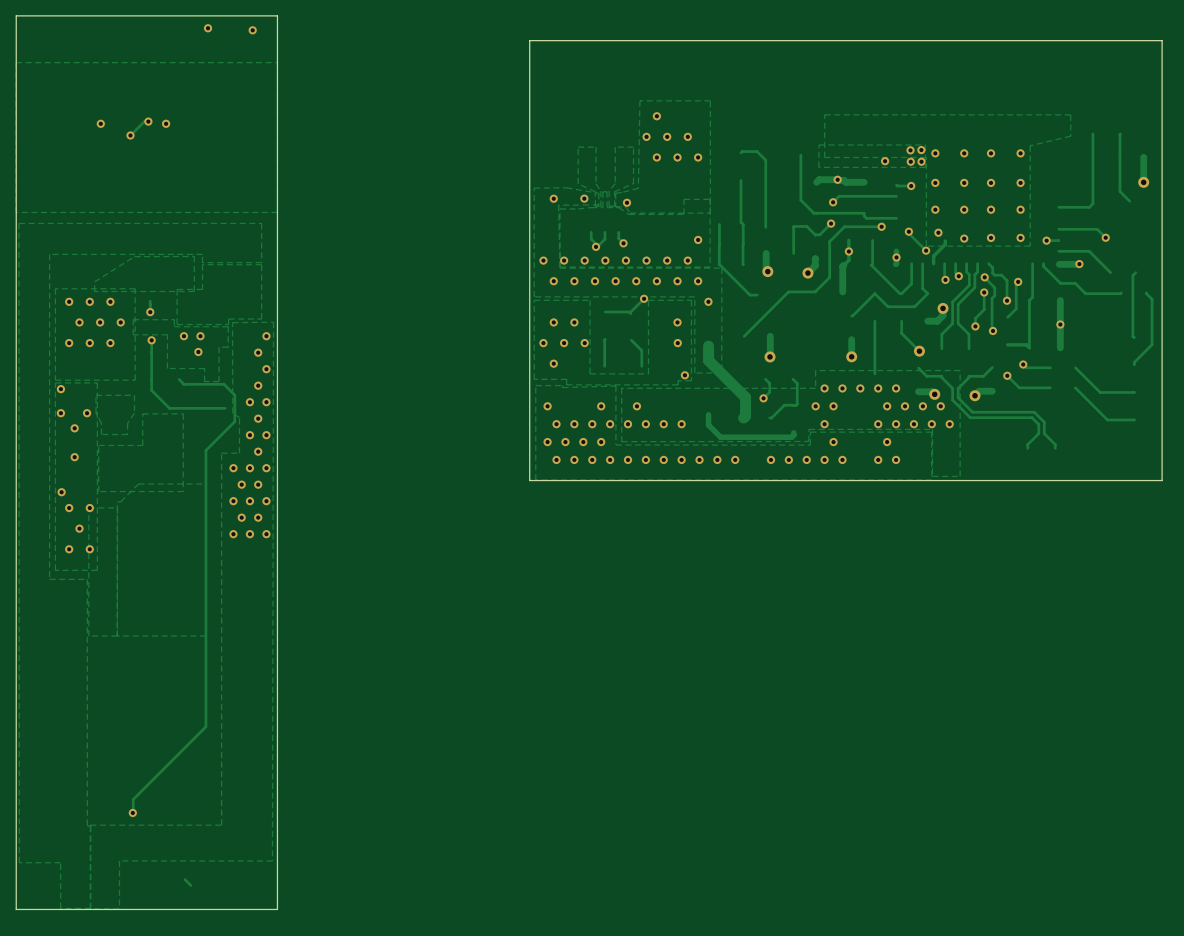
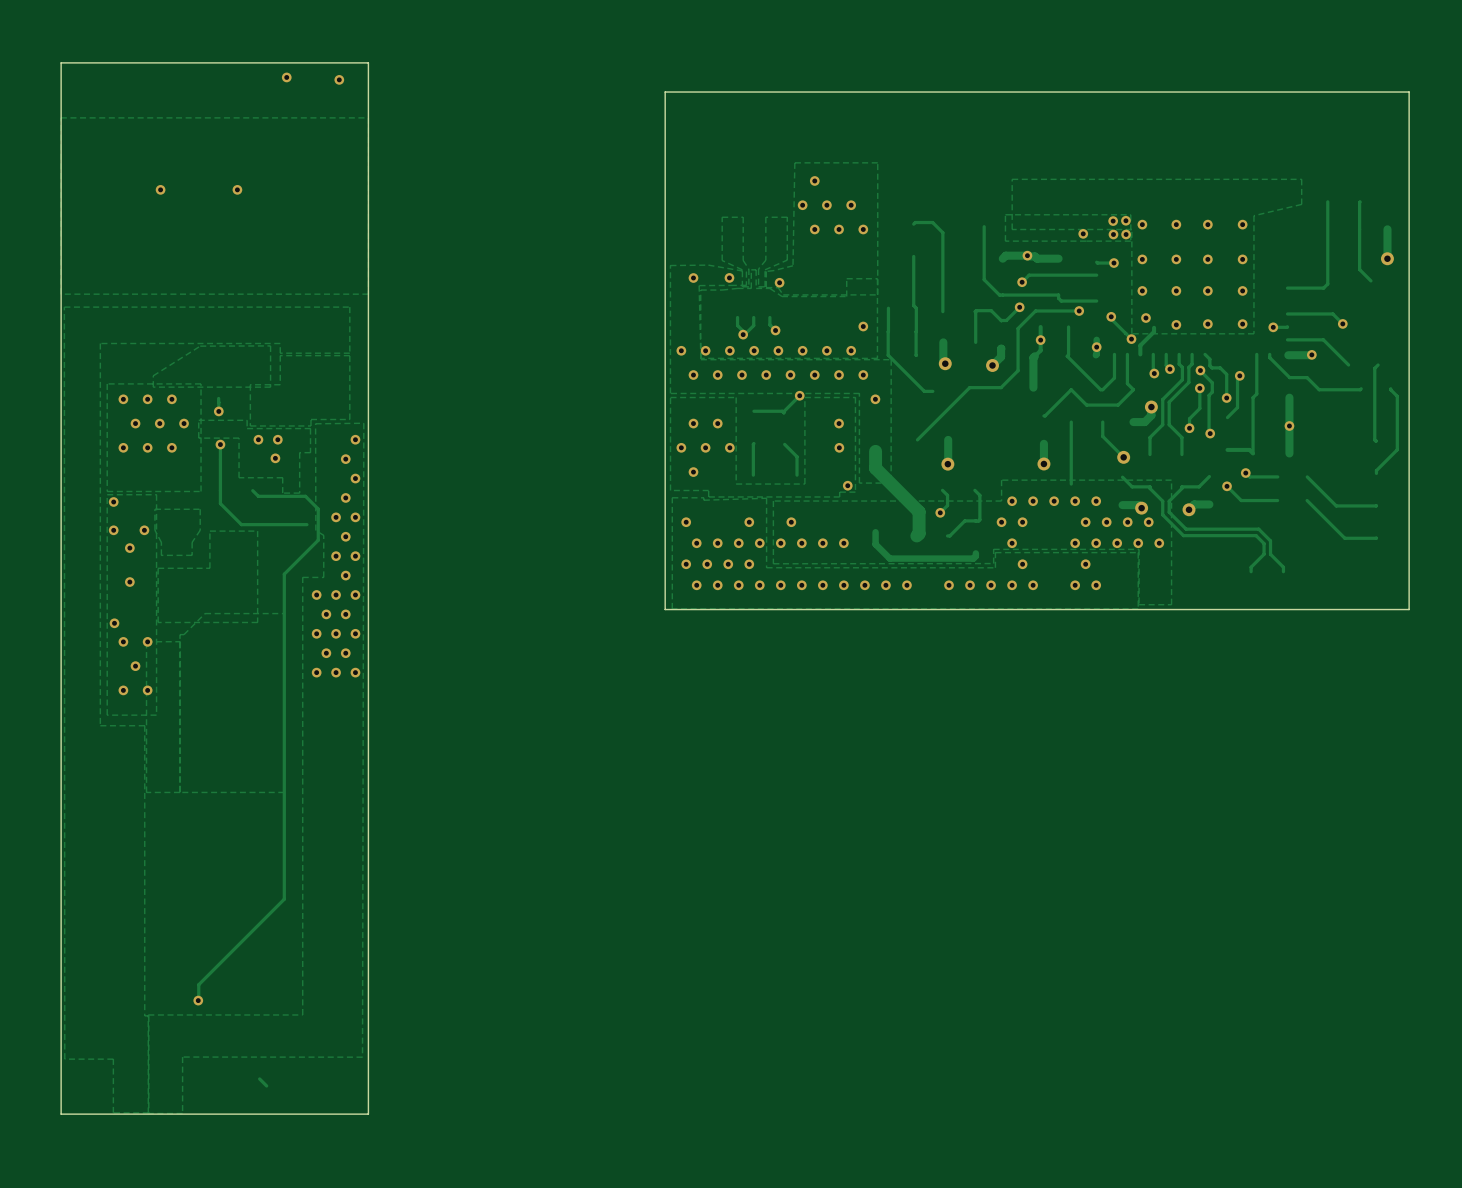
track: (148, 121) (144, 121) (130, 135) -> none
via: (148, 121) -> none
via: (130, 135) -> none

